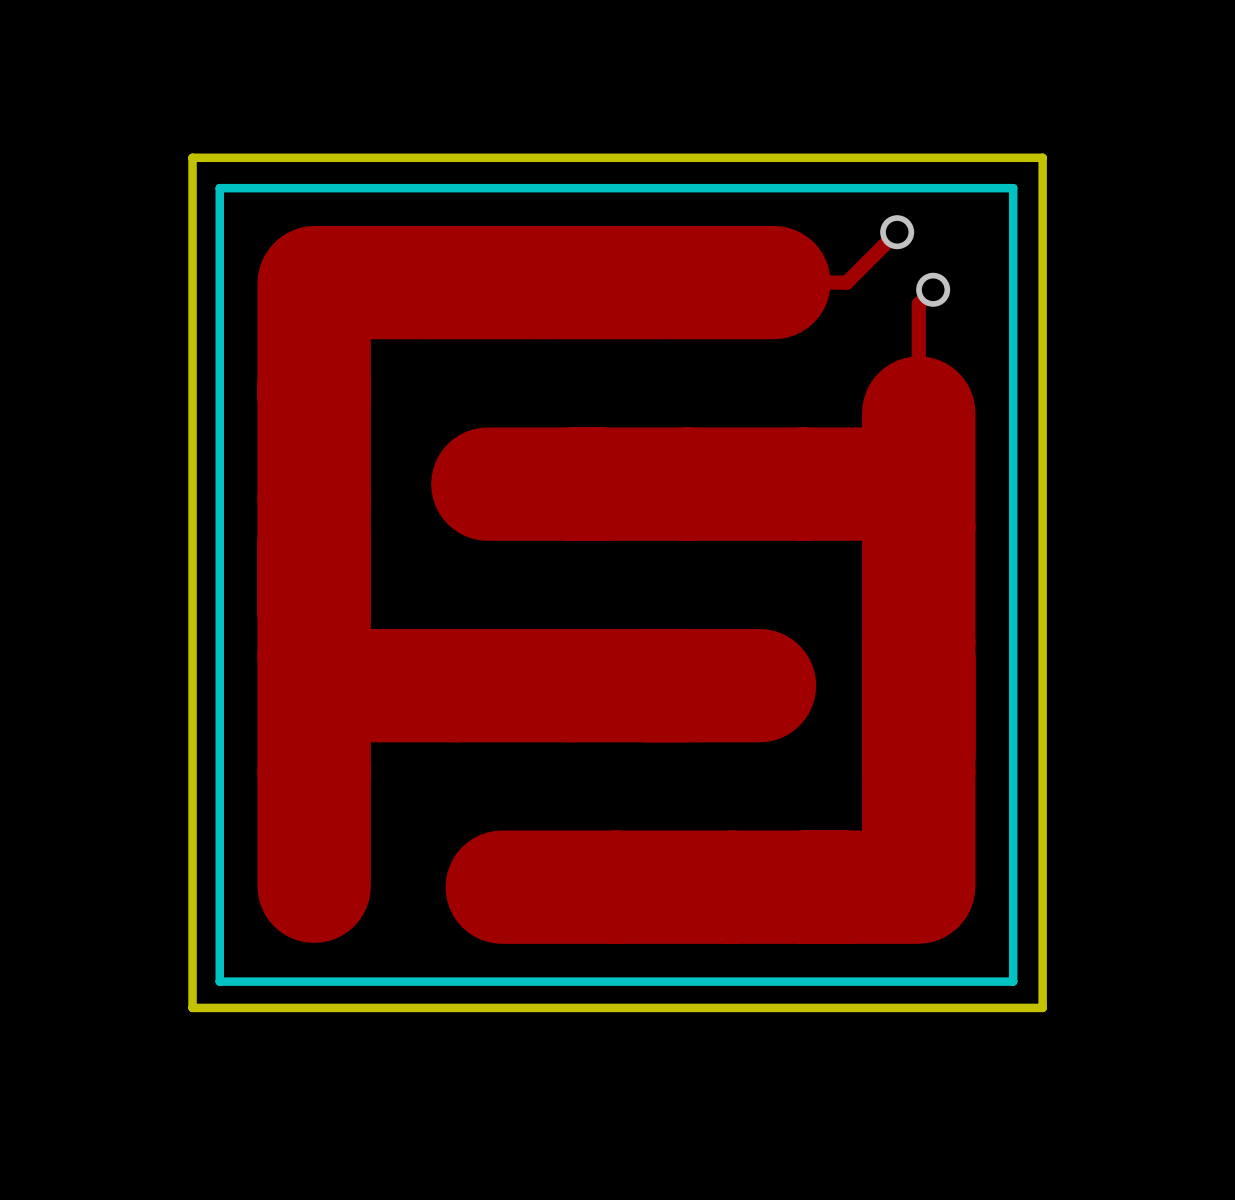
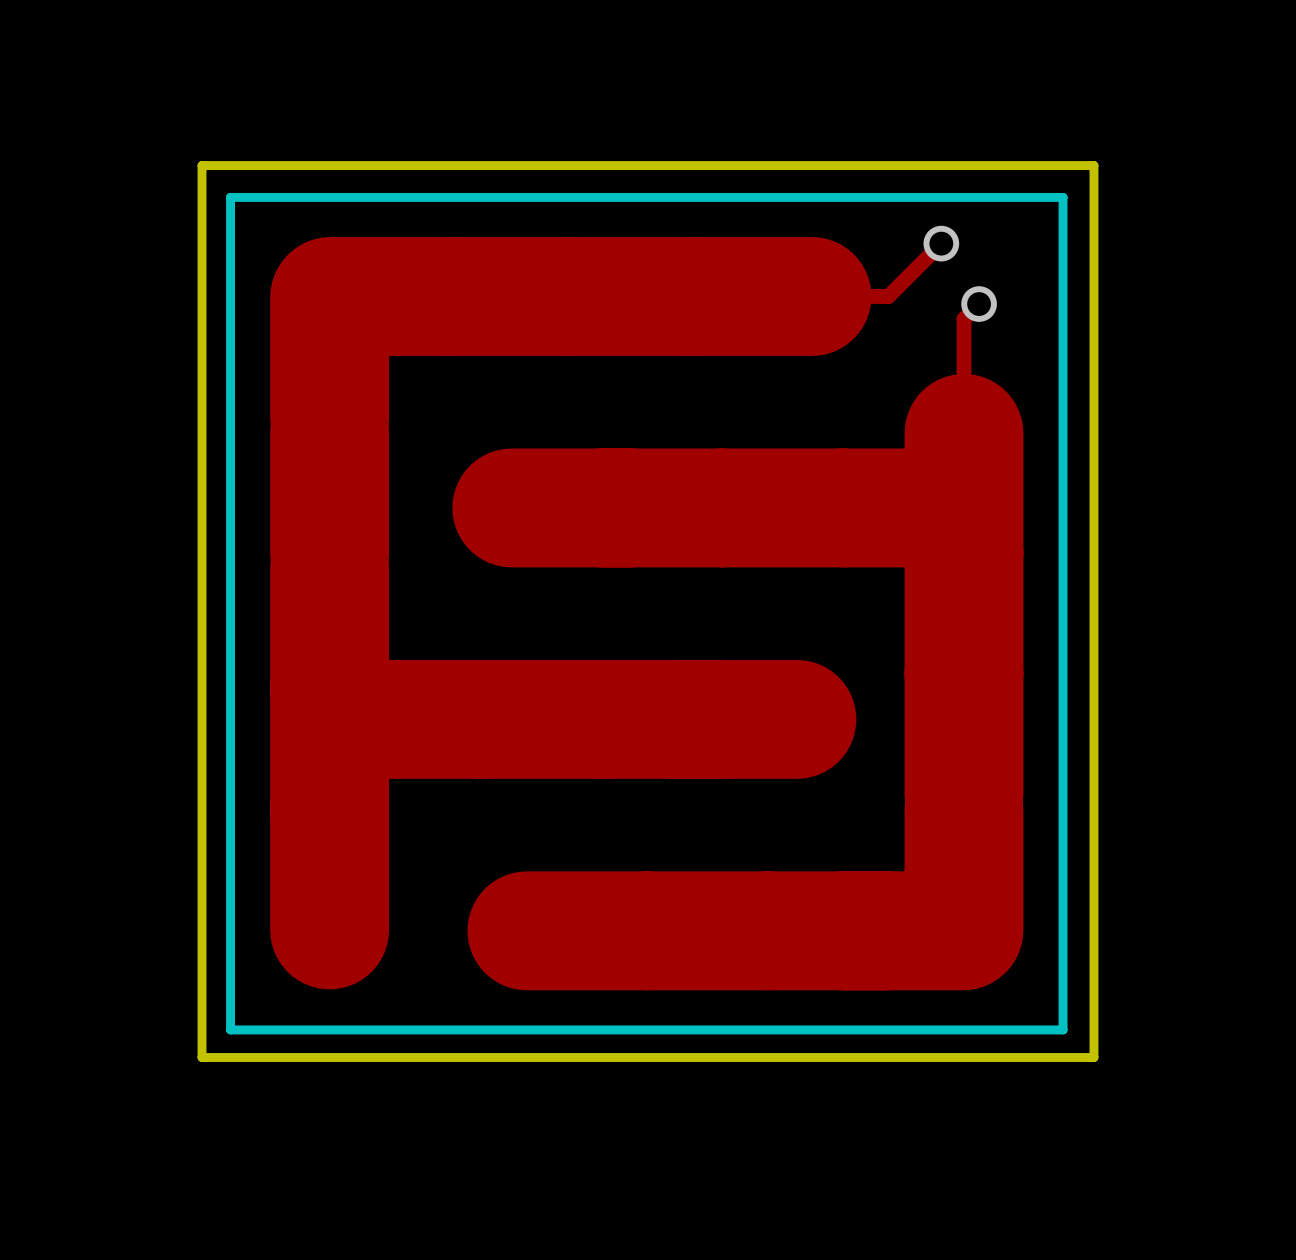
part footprint: [215, 183, 1018, 986] -> [226, 192, 1068, 1035]

